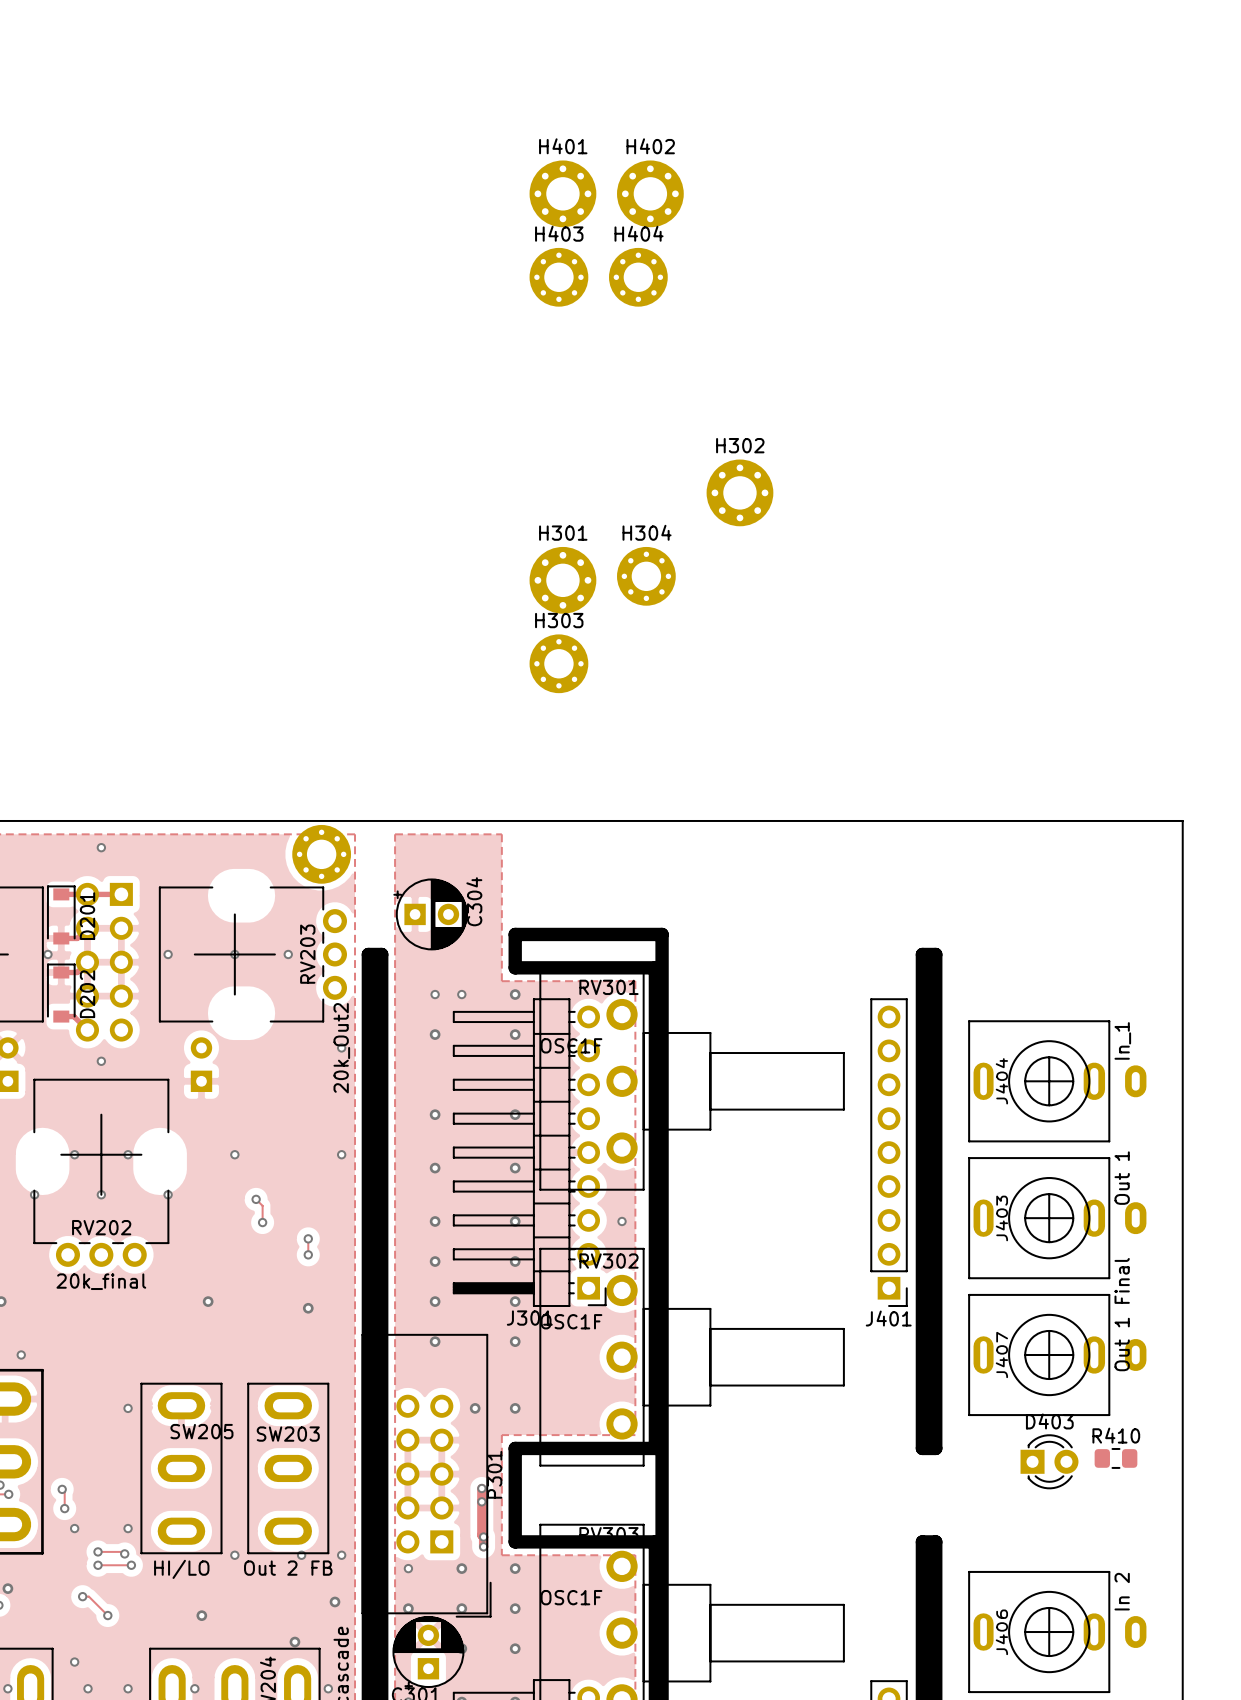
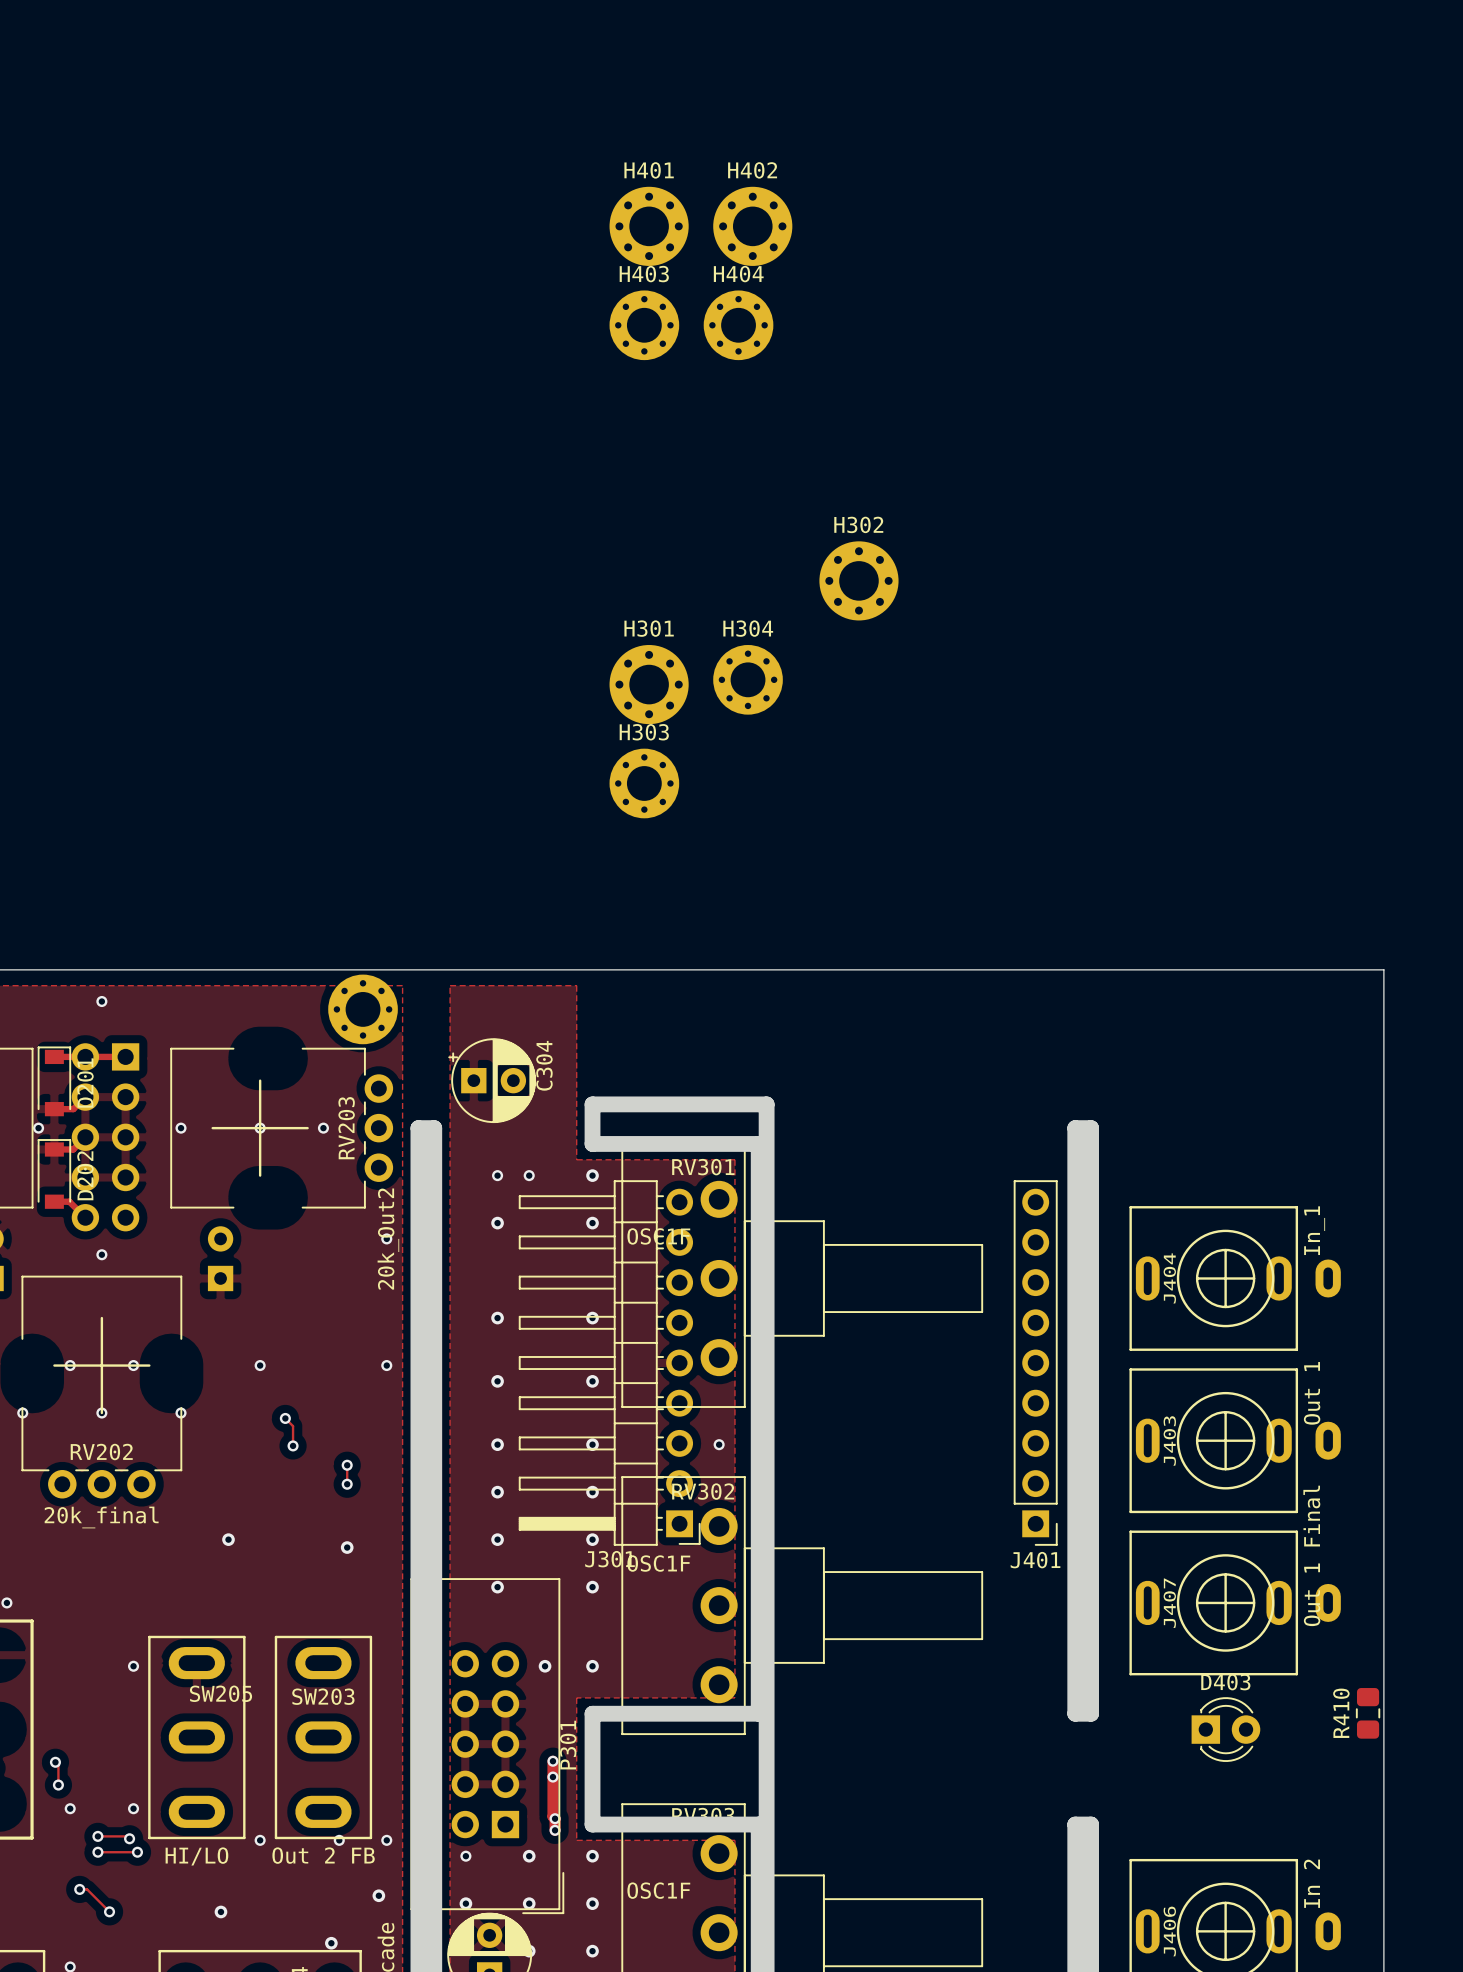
R410 name position: R410 (1116, 1435) -> R410 (1341, 1713)
R410 rotation: 0° (1115, 1458) -> 90° clockwise (1368, 1713)
R410 position: (1115, 1458) -> (1368, 1713)

